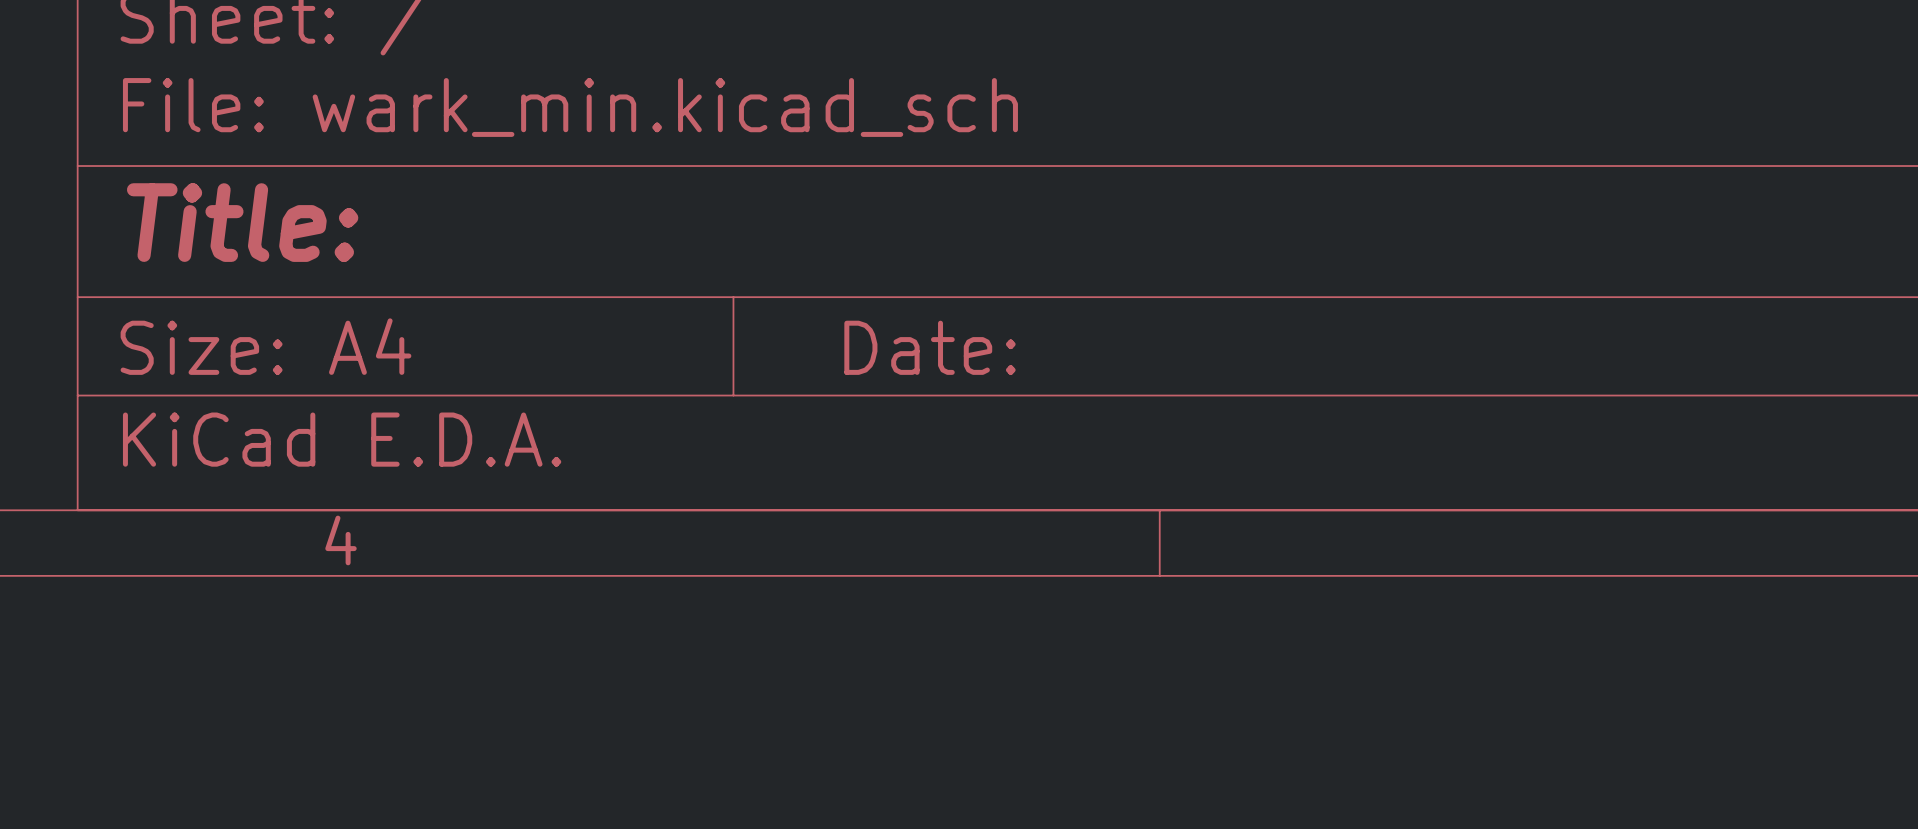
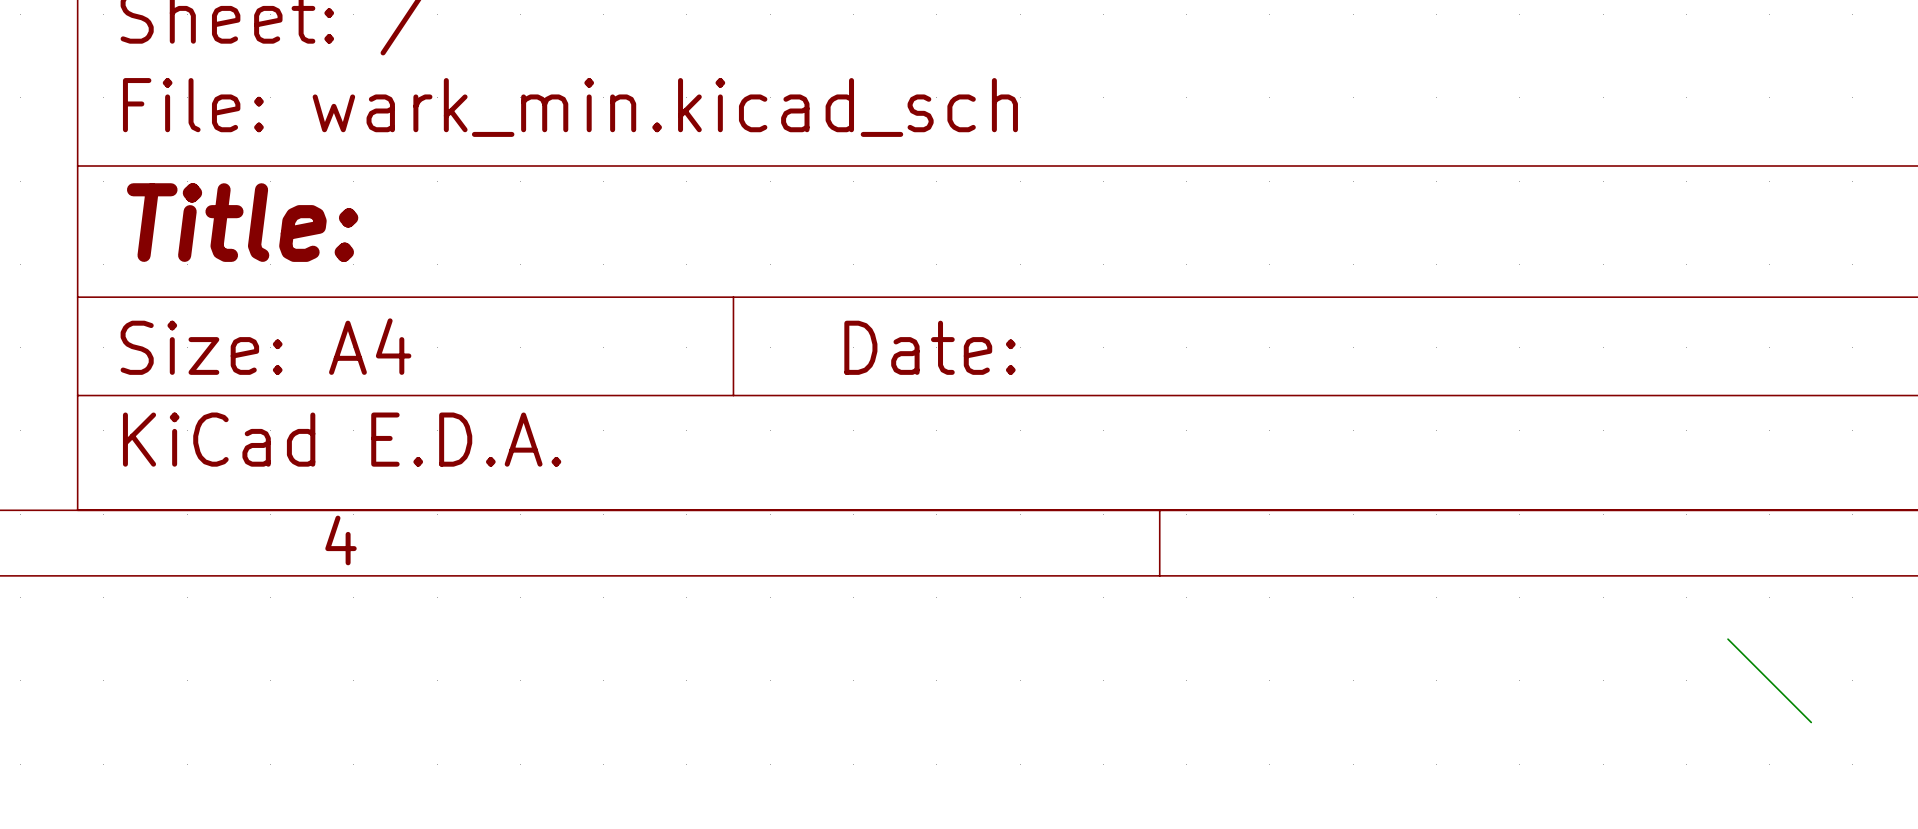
wire: none -> (1727, 639) (1811, 722)

